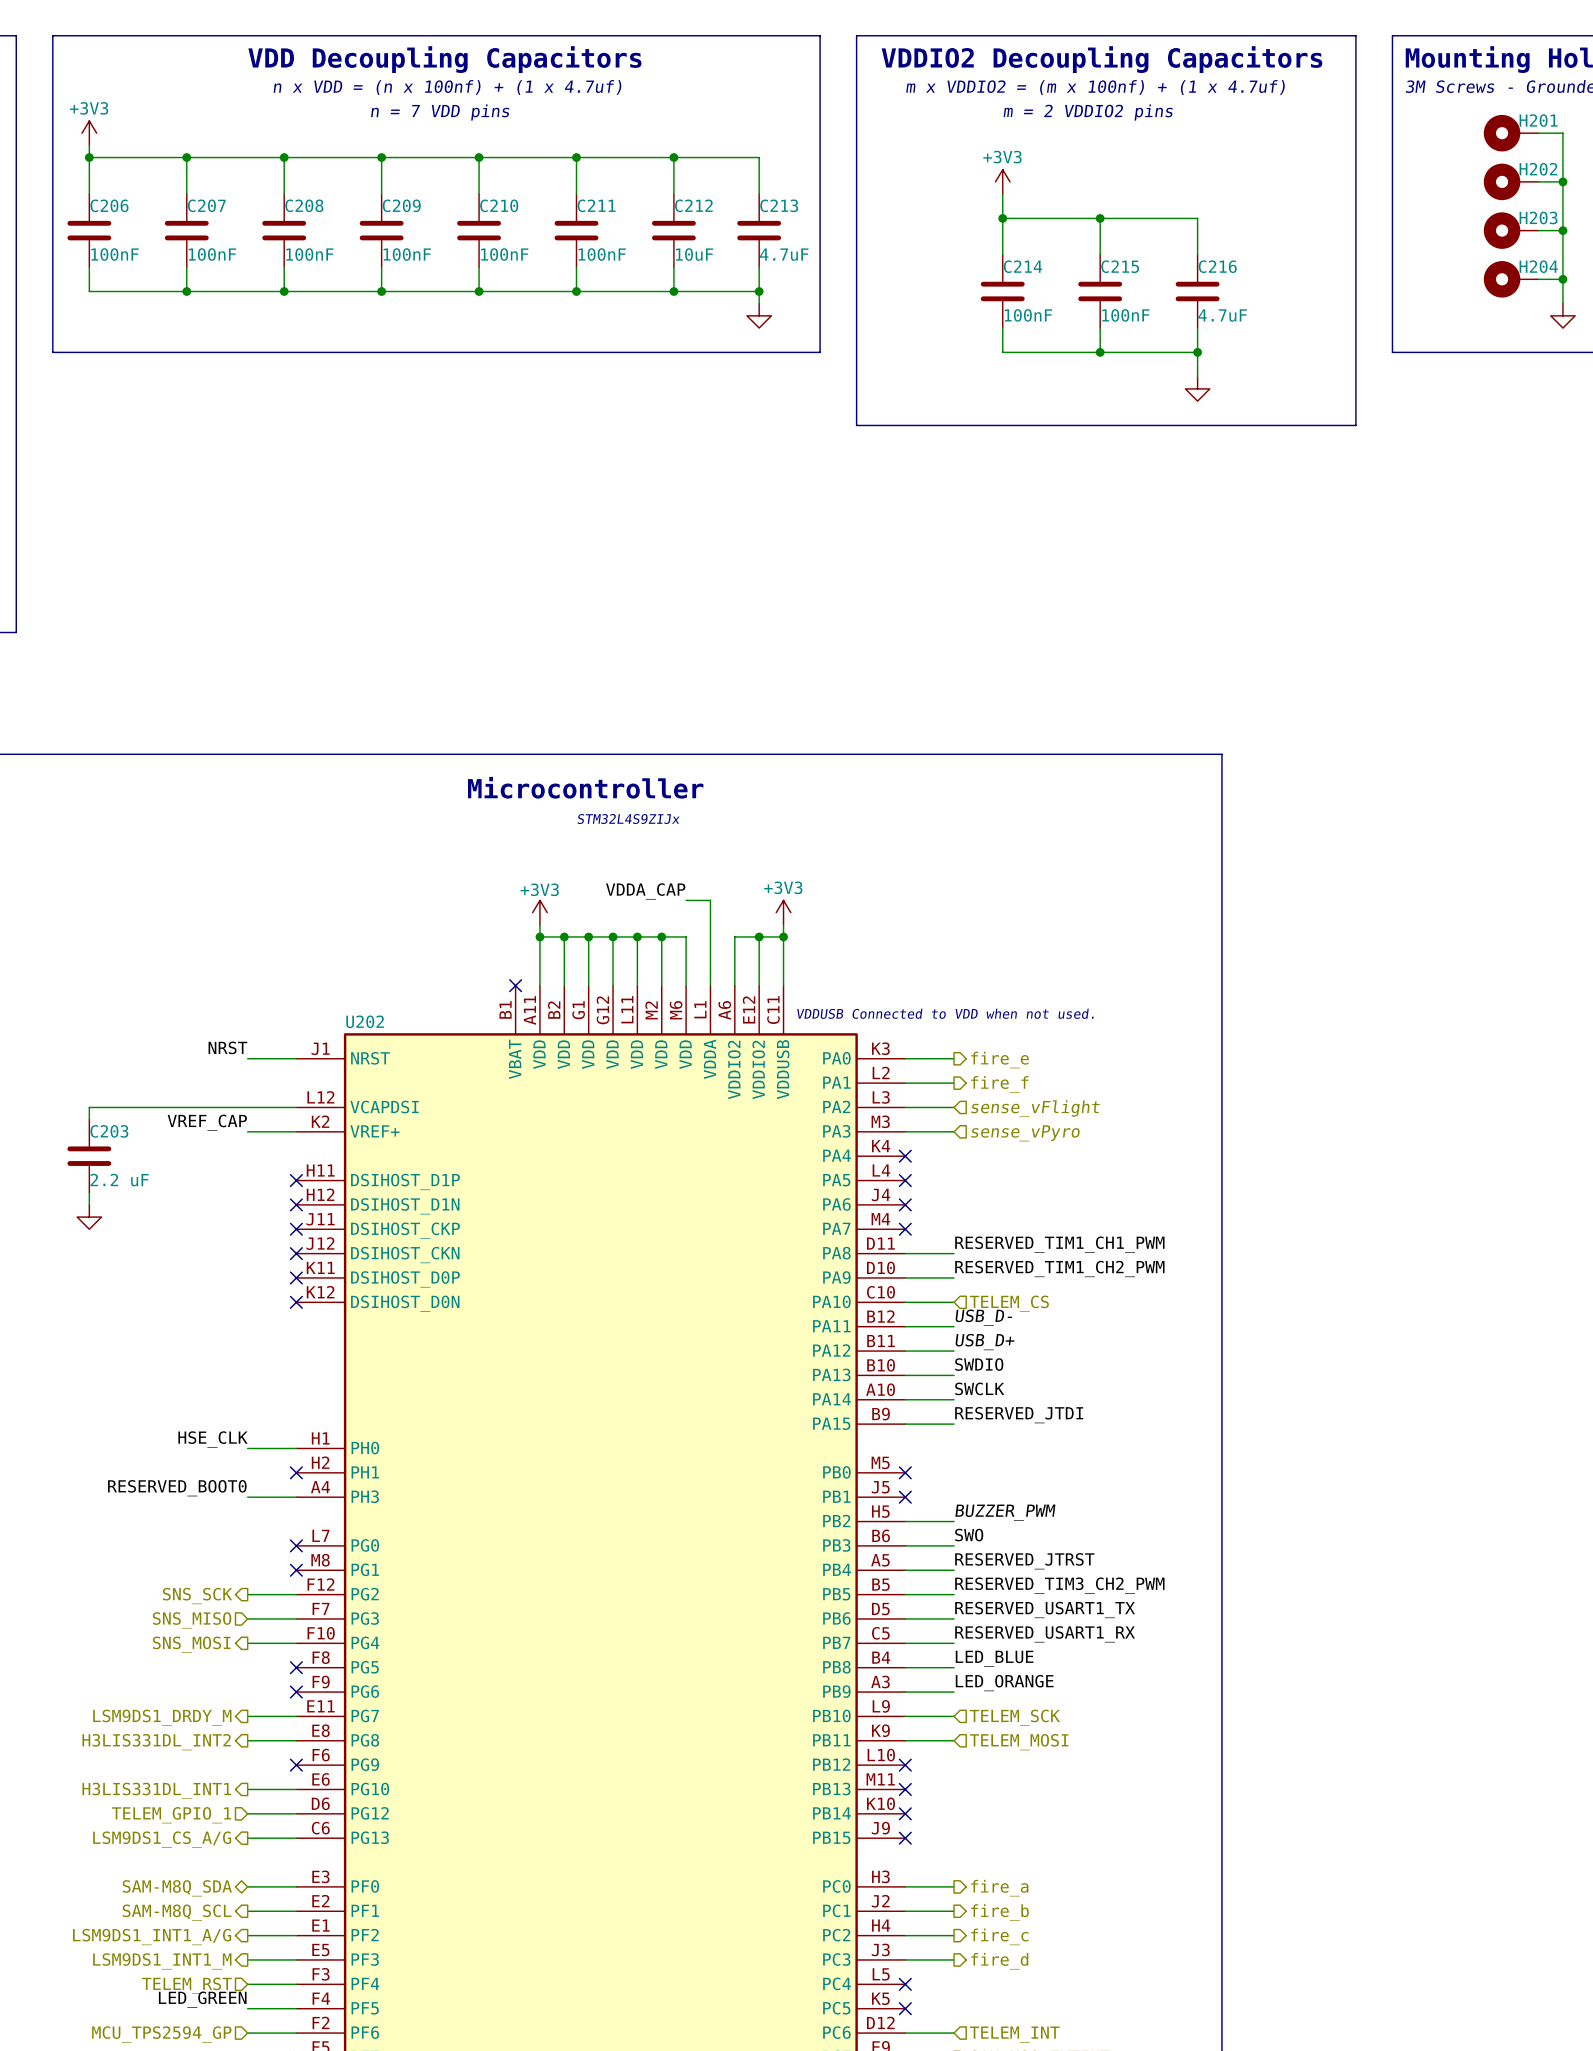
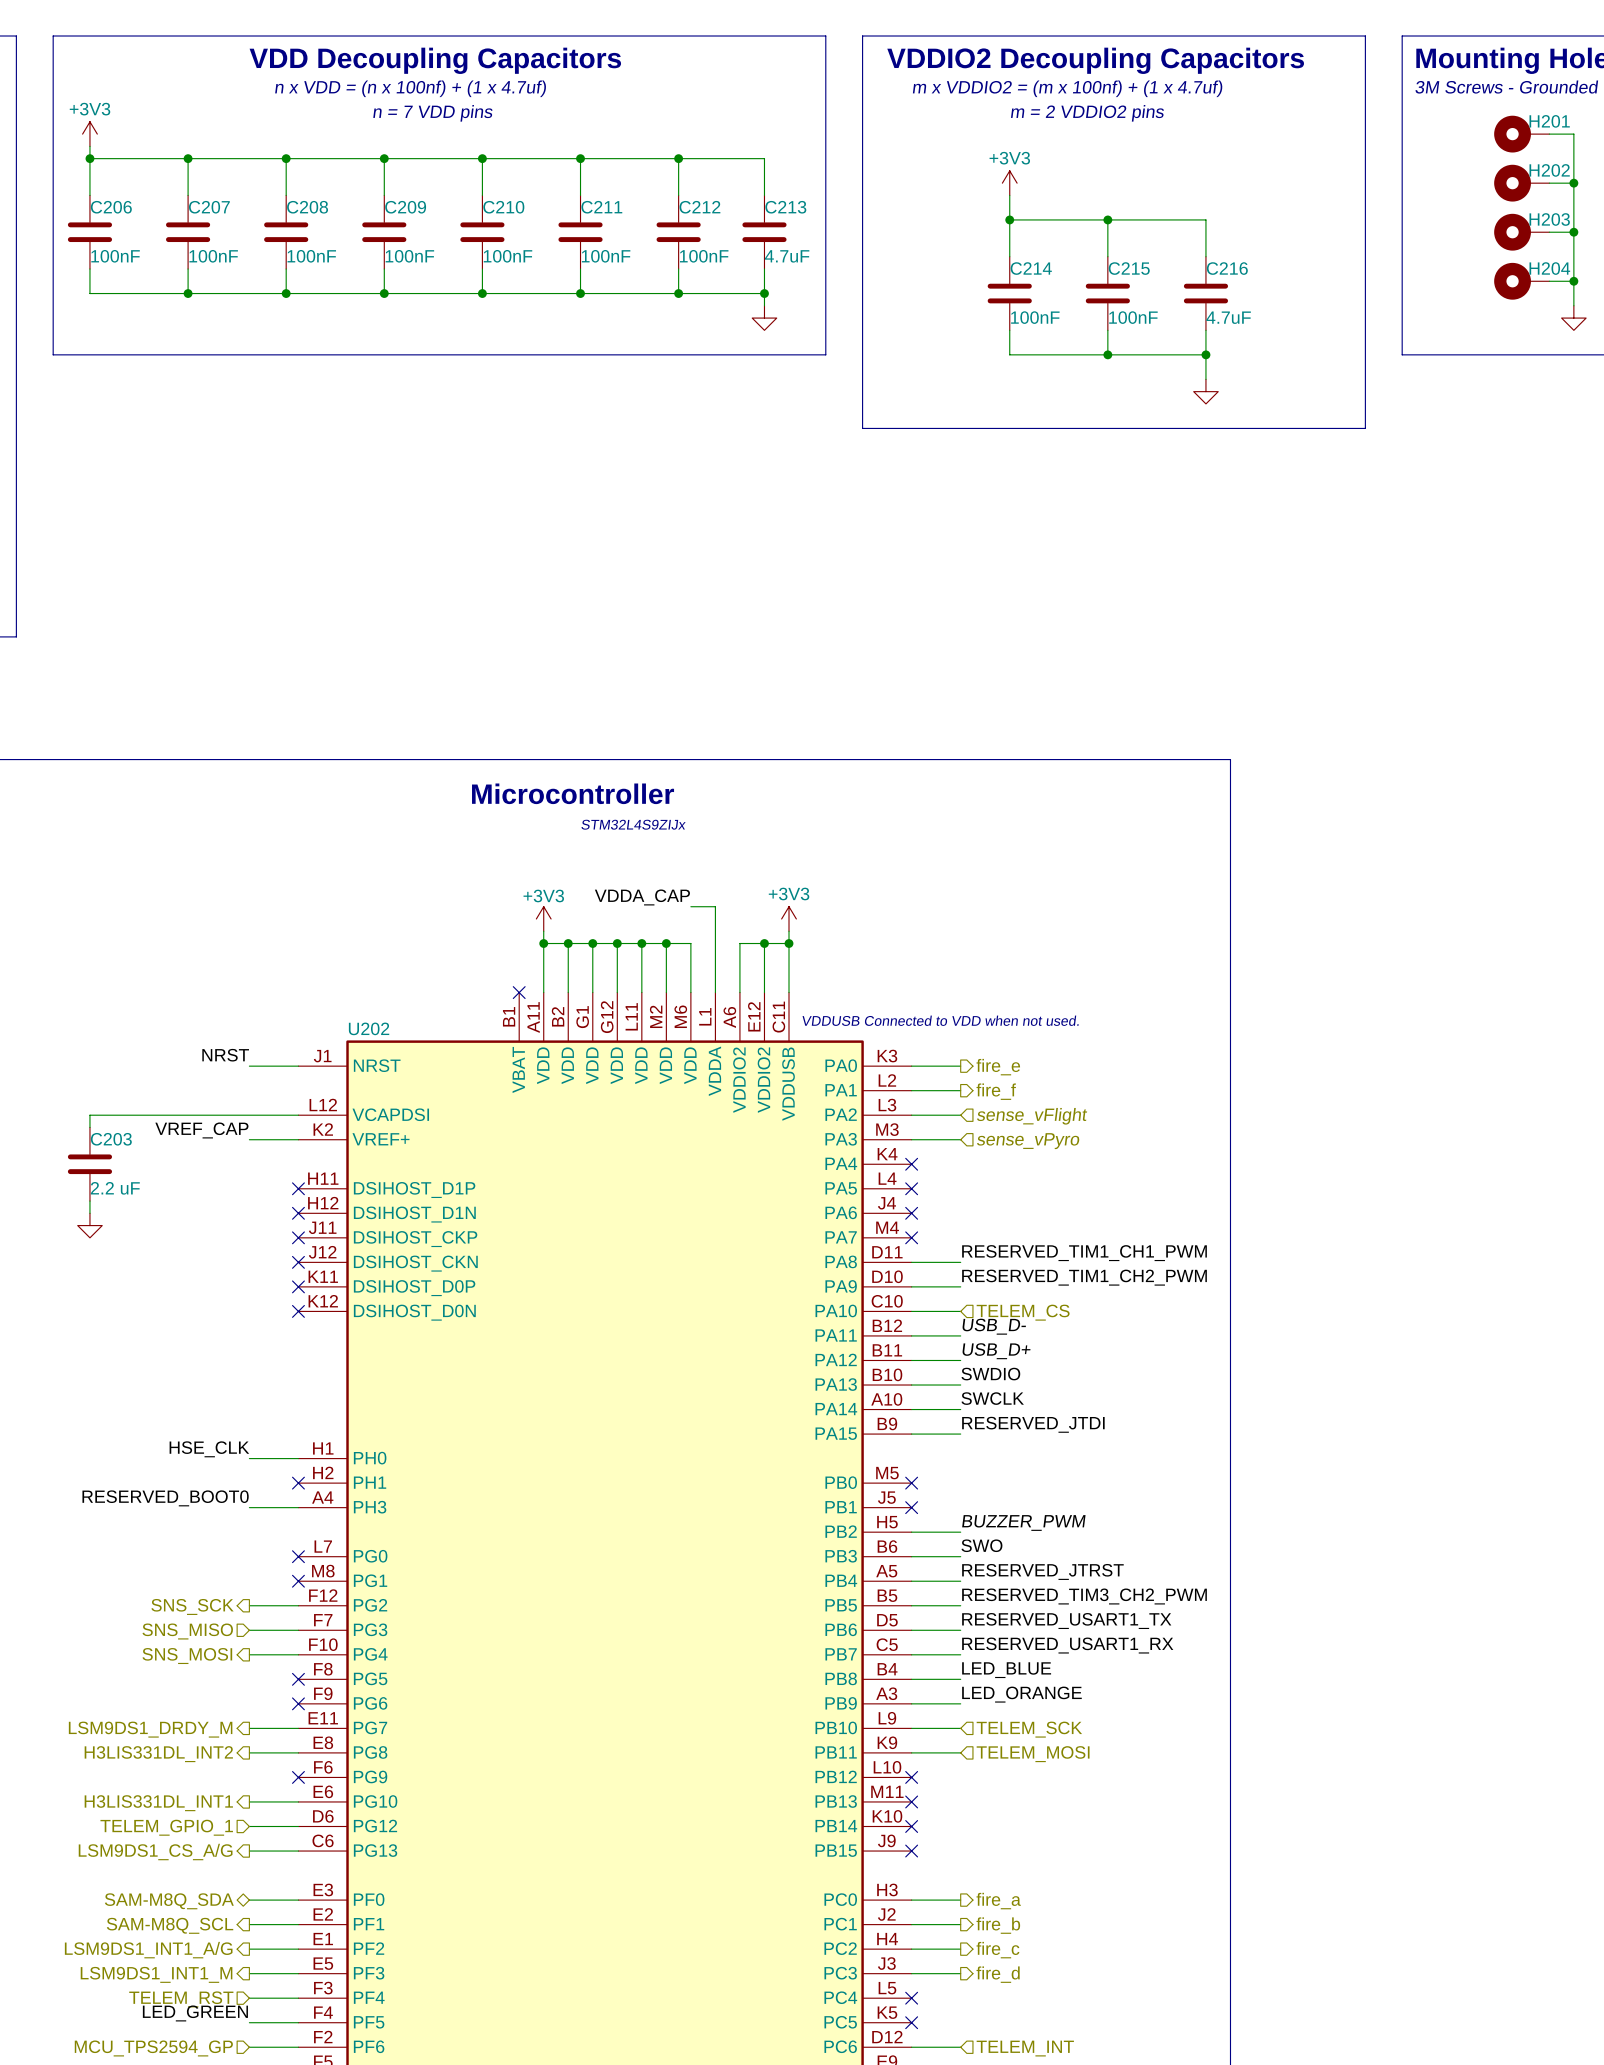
C212 value: 10uF (694, 254) -> 100nF (704, 256)

